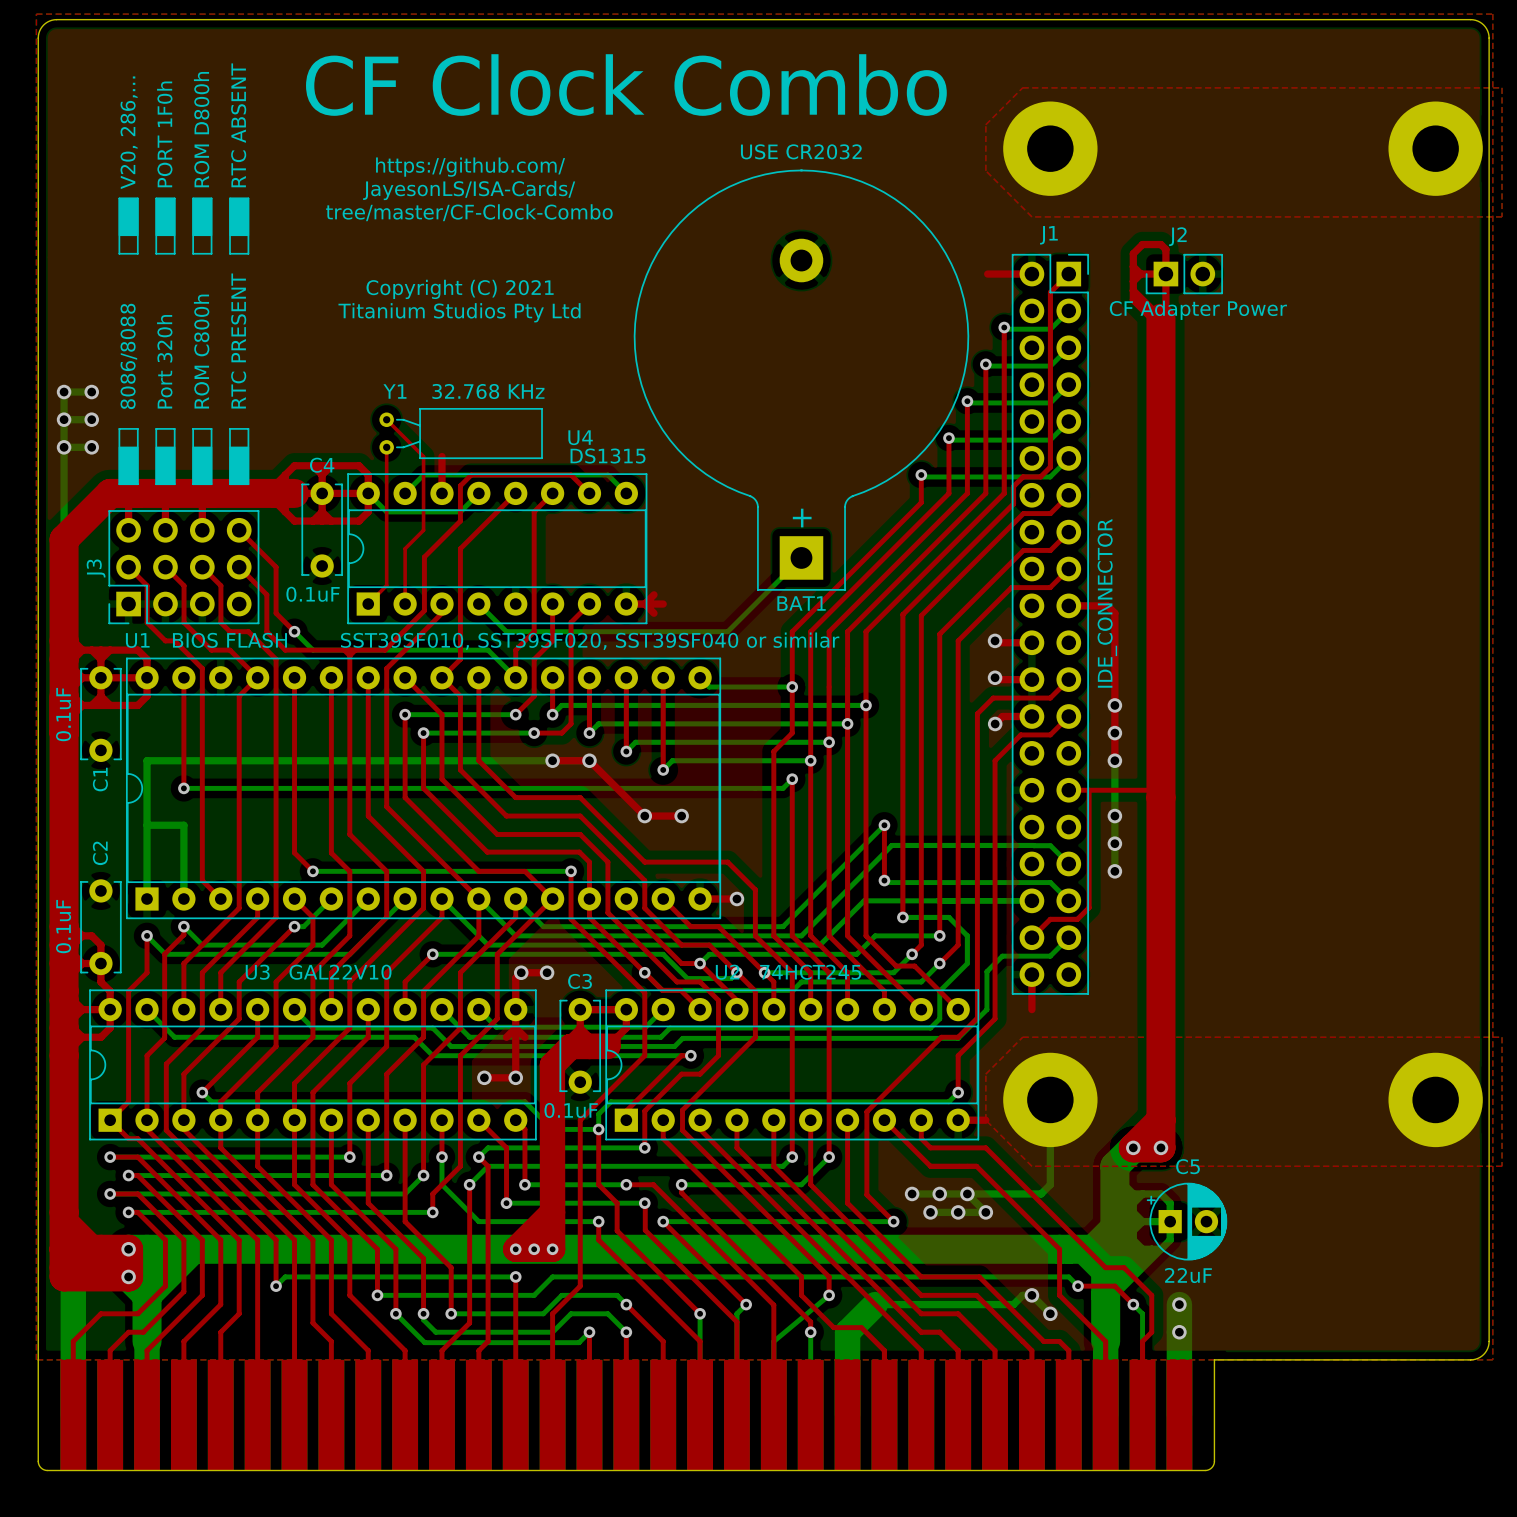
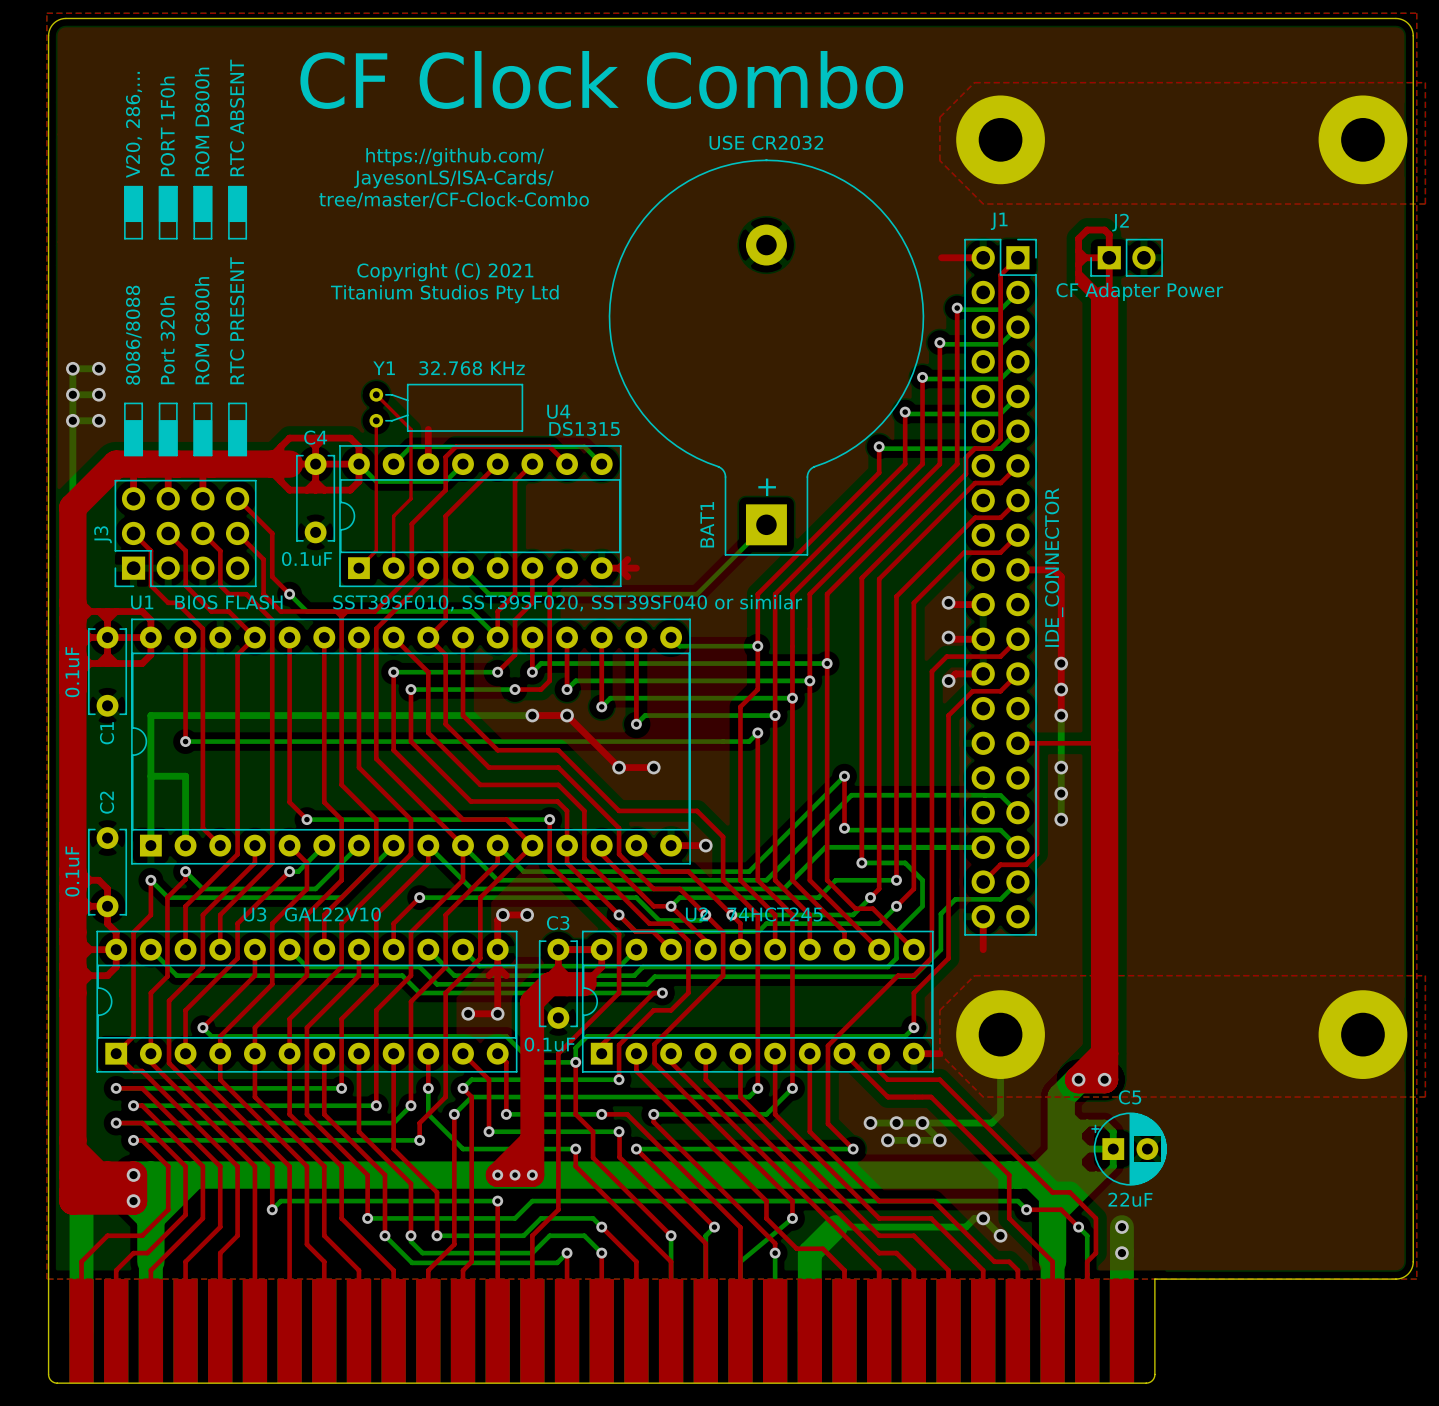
BAT1 name rotation: 0° (801, 603) -> 90° counterclockwise (707, 524)
BAT1 name position: BAT1 (801, 603) -> BAT1 (707, 524)

